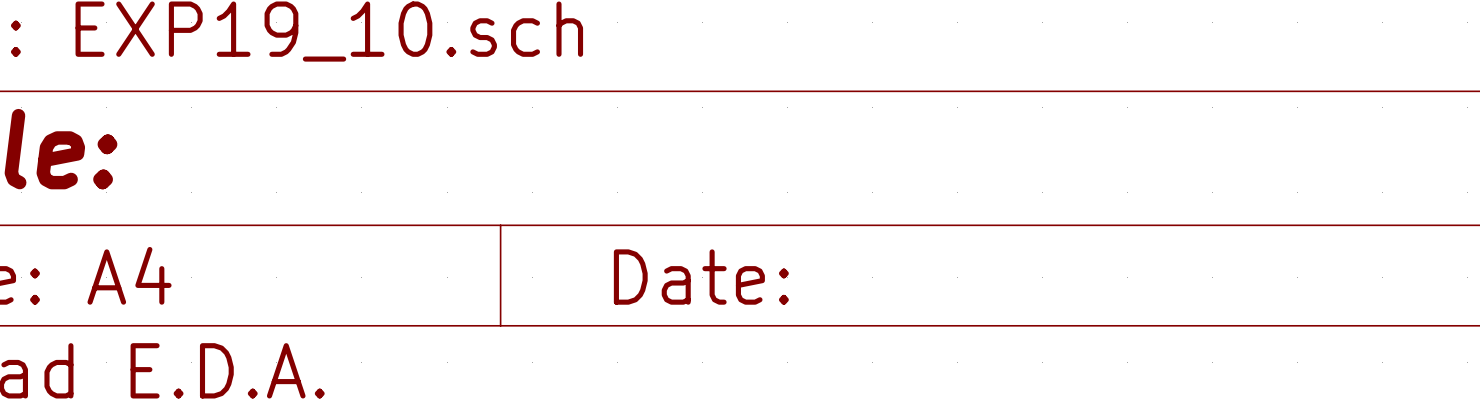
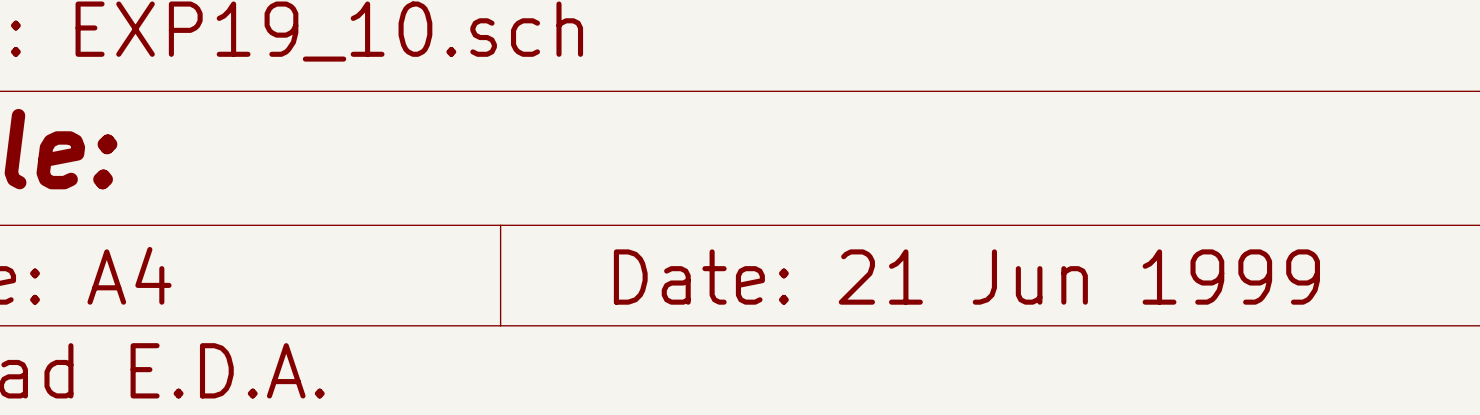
title block: Date: (701, 277) -> Date: 21 Jun 1999 (966, 277)

